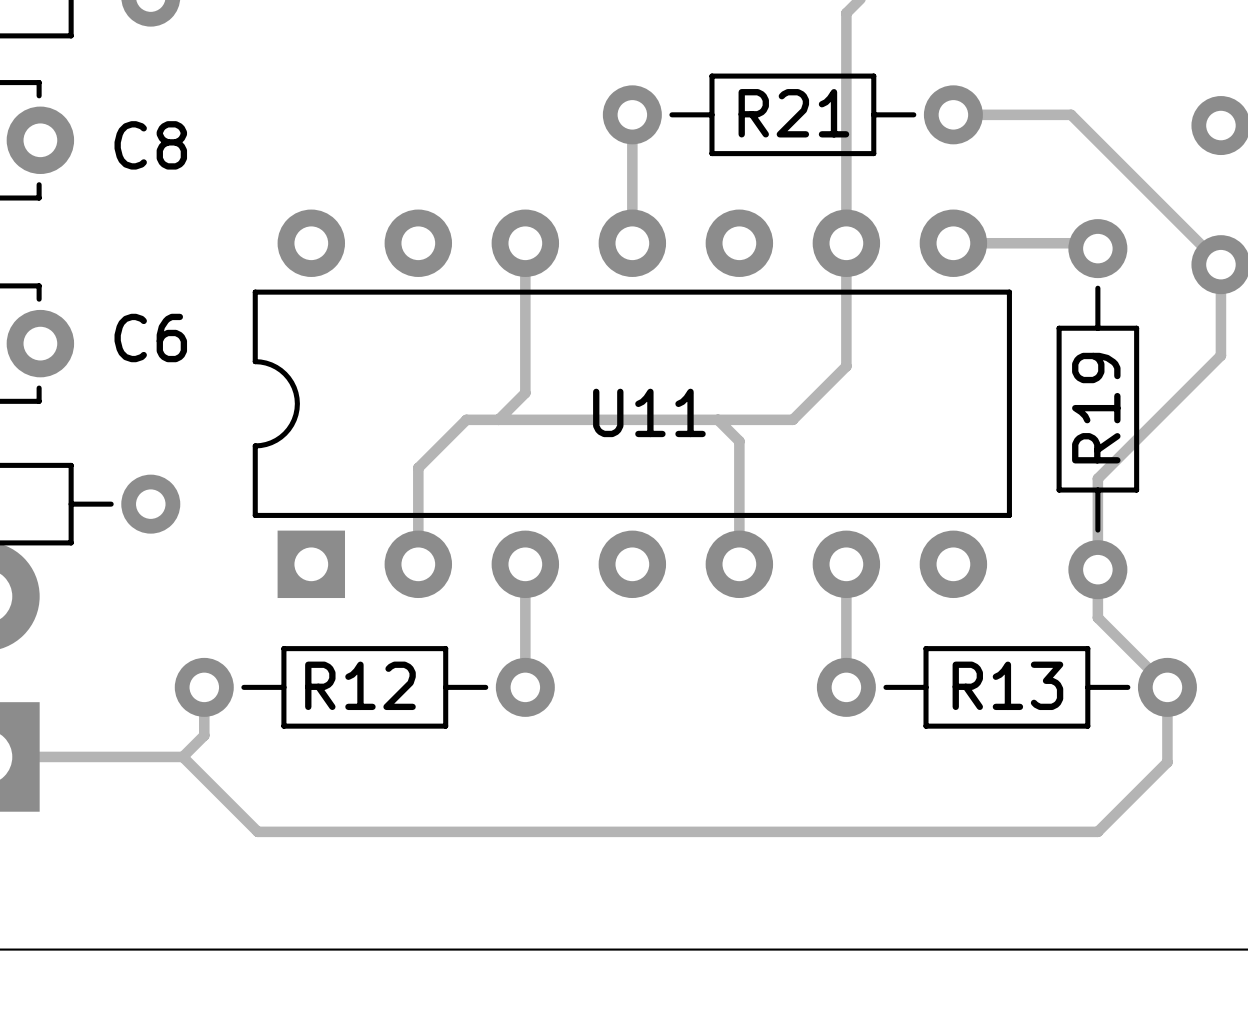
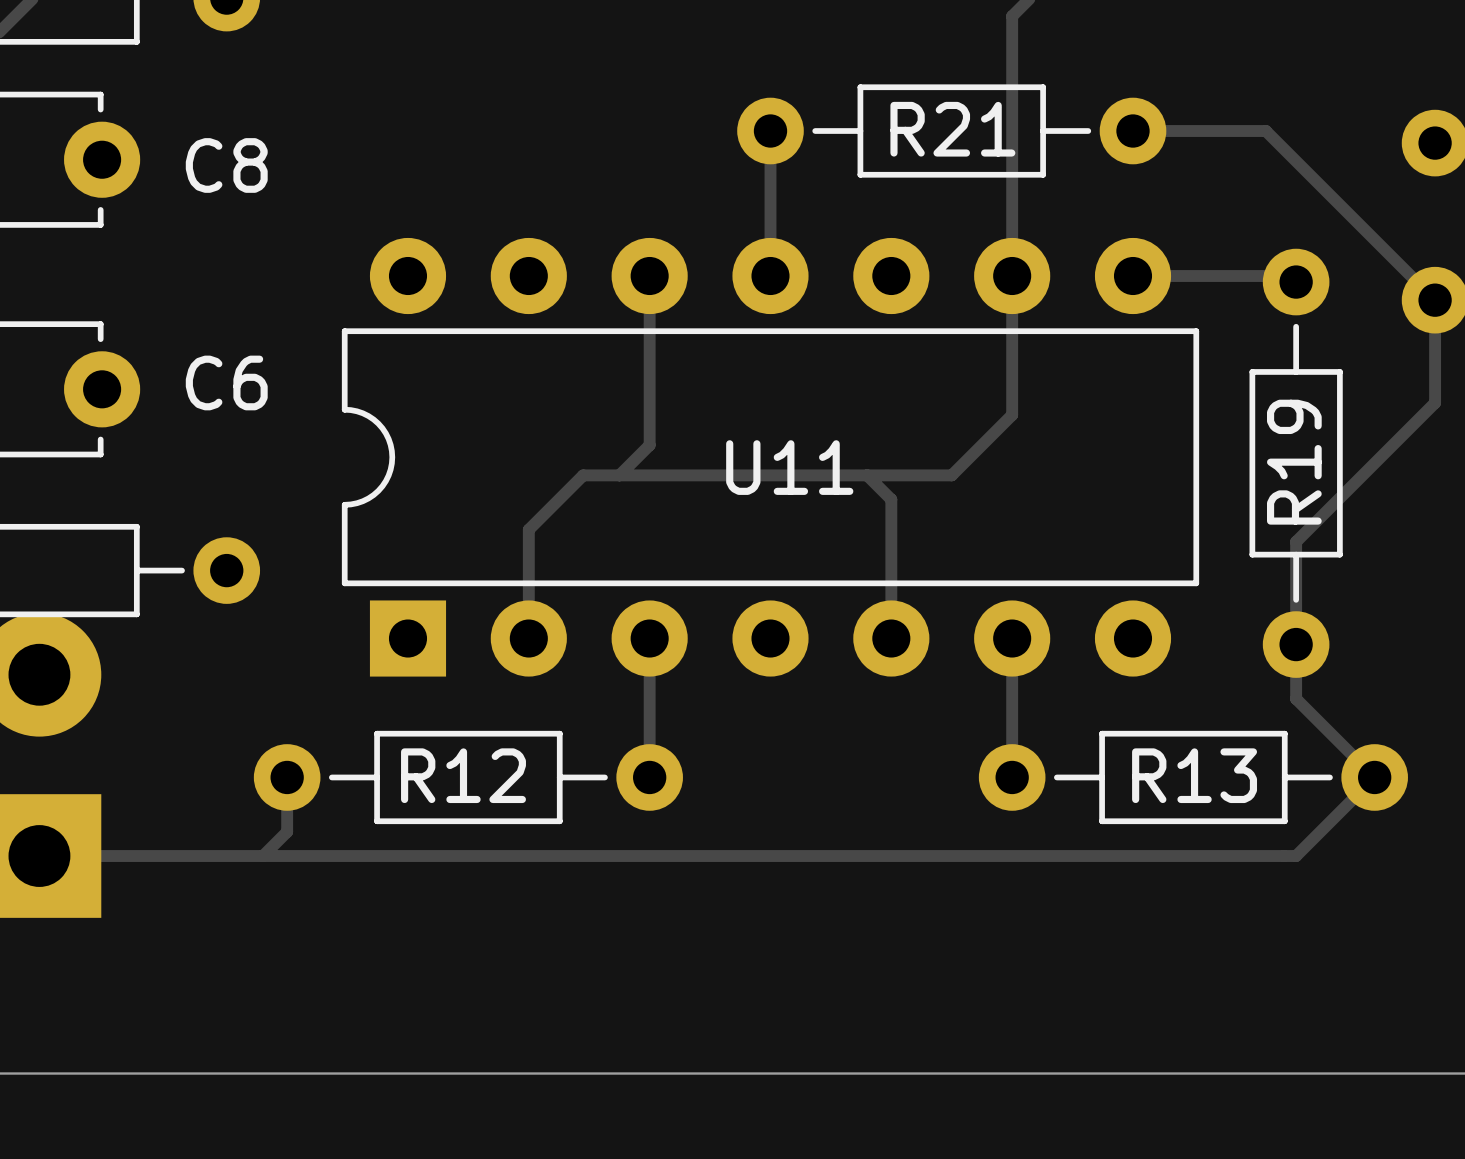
track: (1167, 687) (1167, 762) (1097, 831) (257, 831) (182, 756) -> (1374, 777) (1296, 856) (262, 856)

